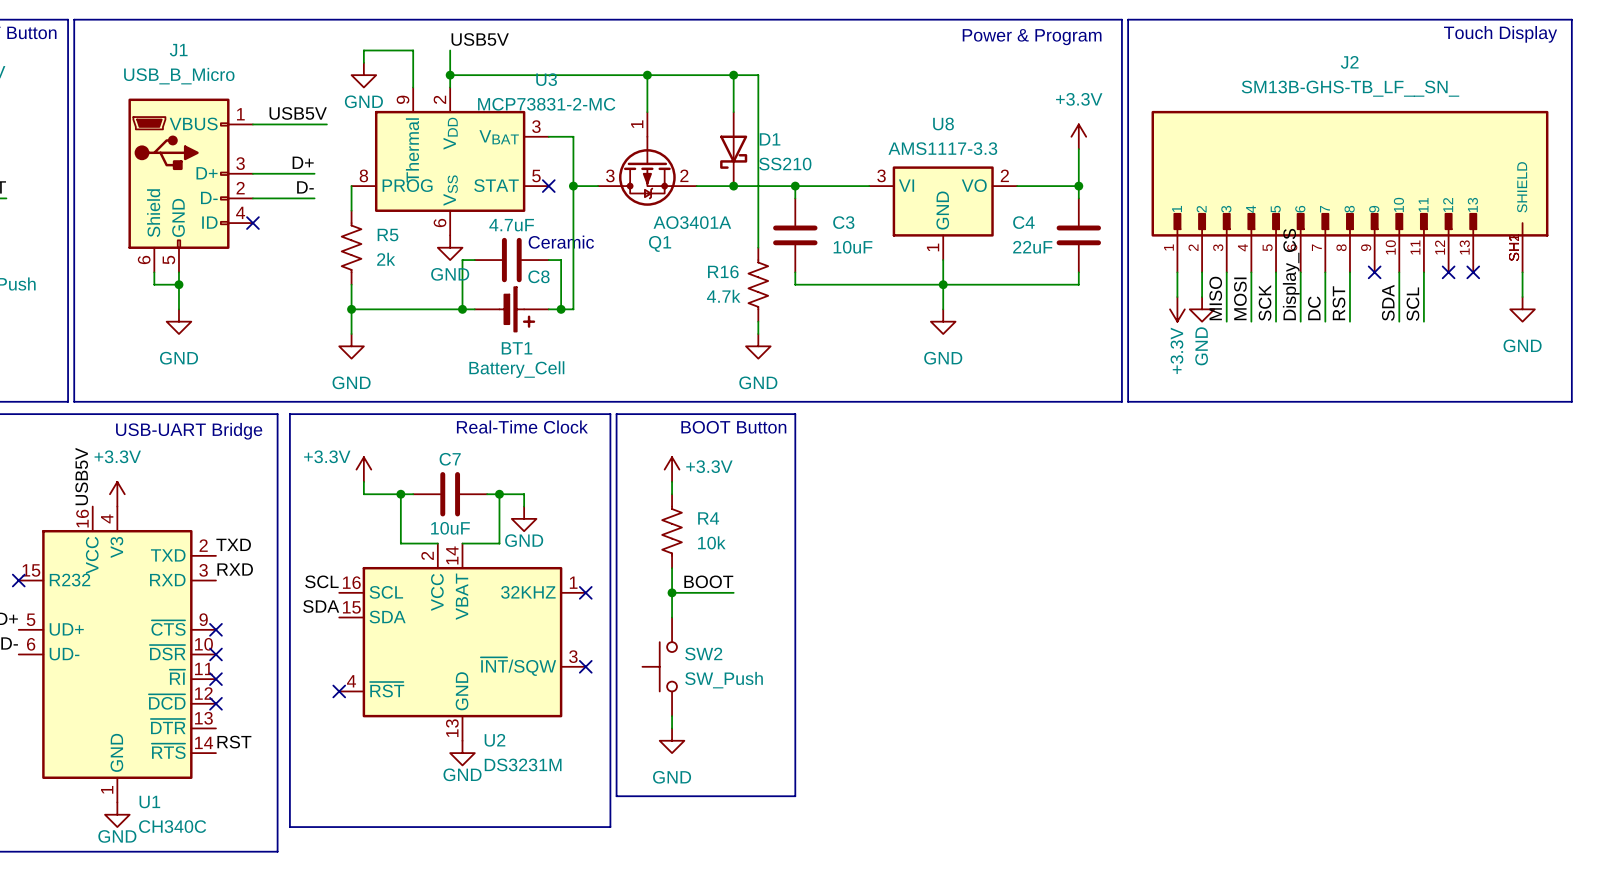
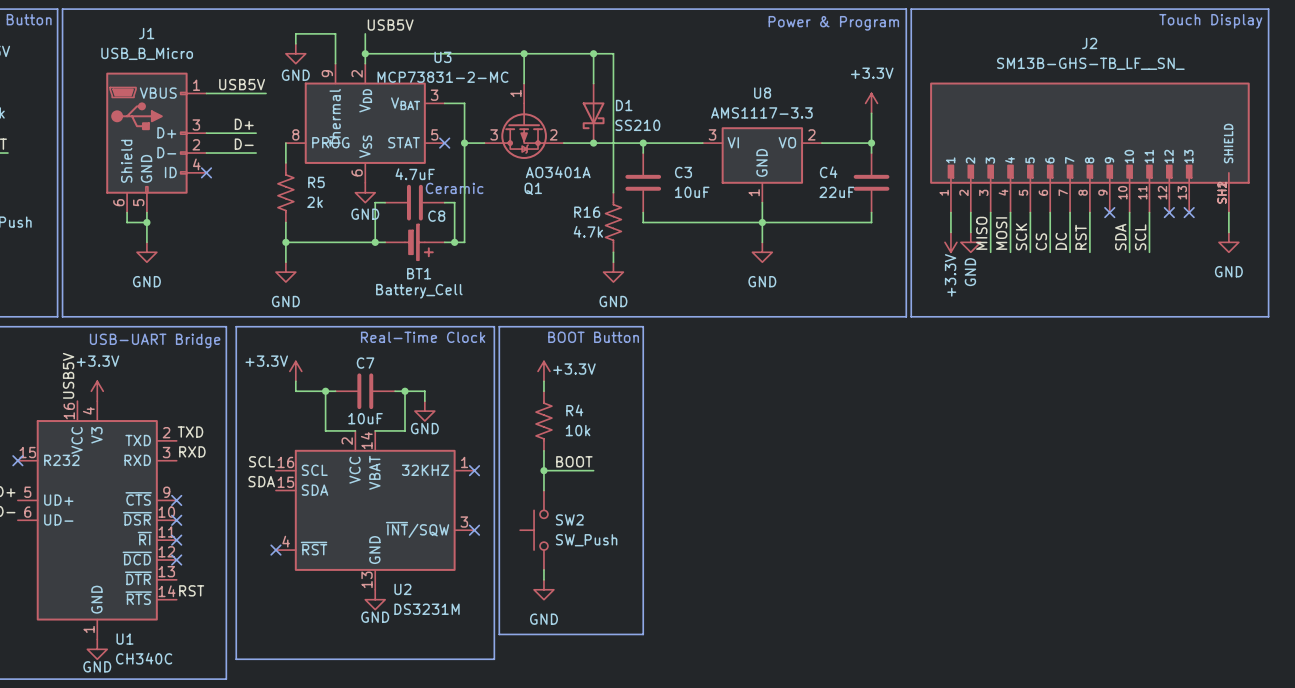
label: Display_CS (1291, 274) -> CS (1041, 241)

